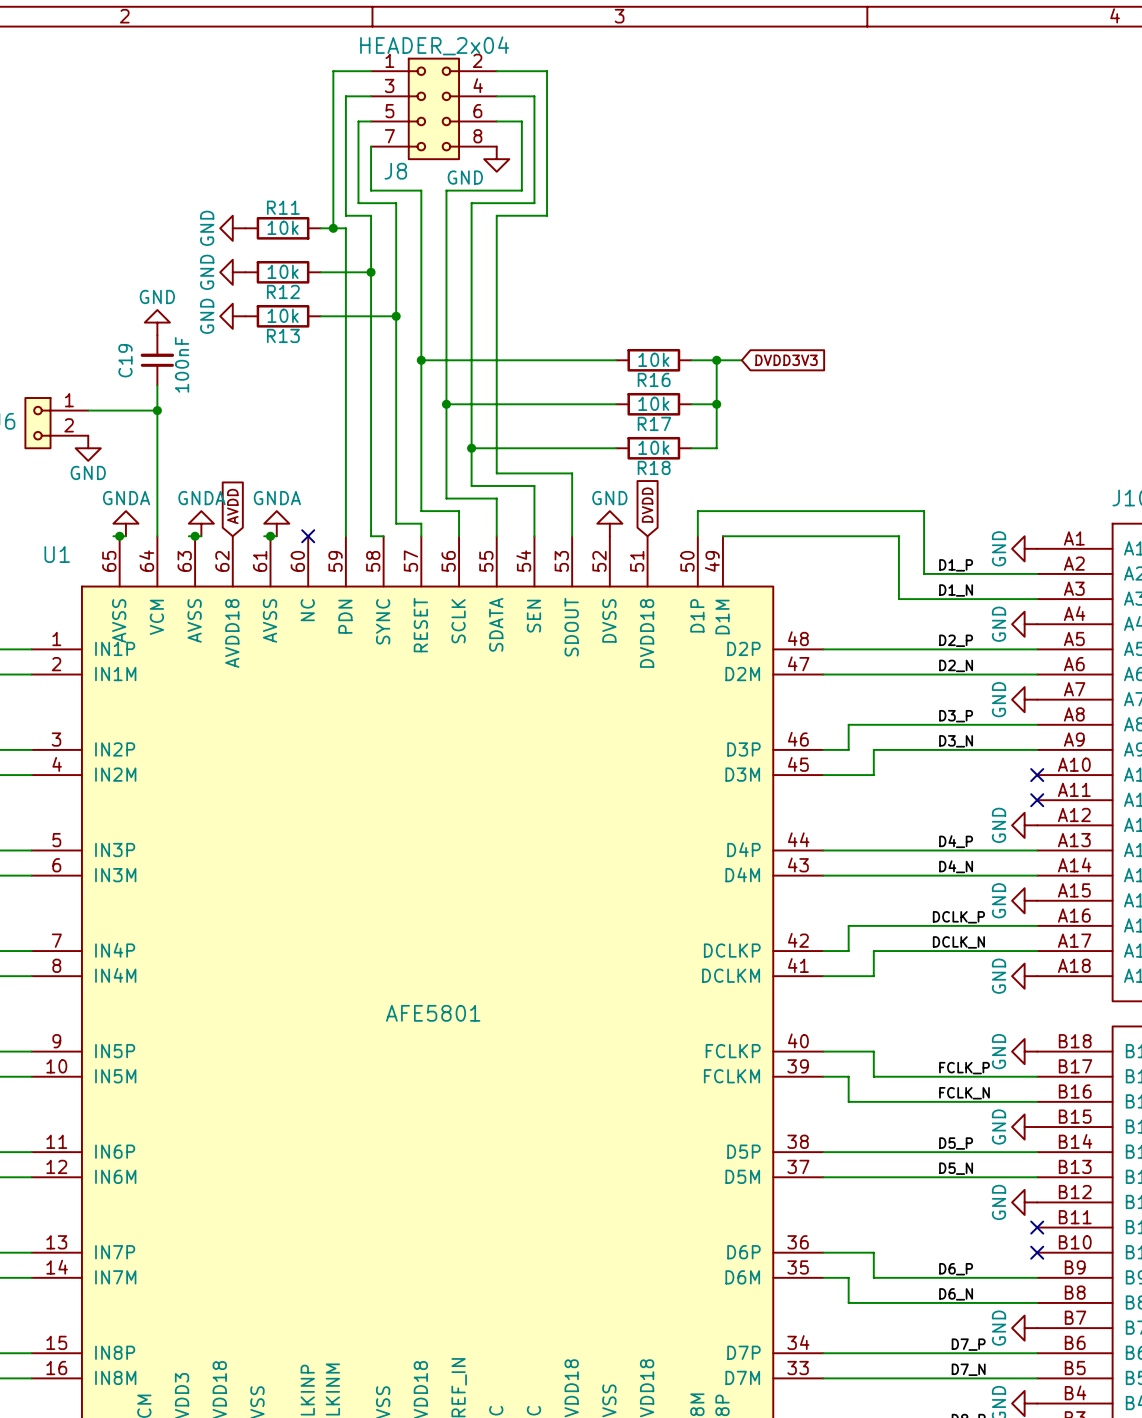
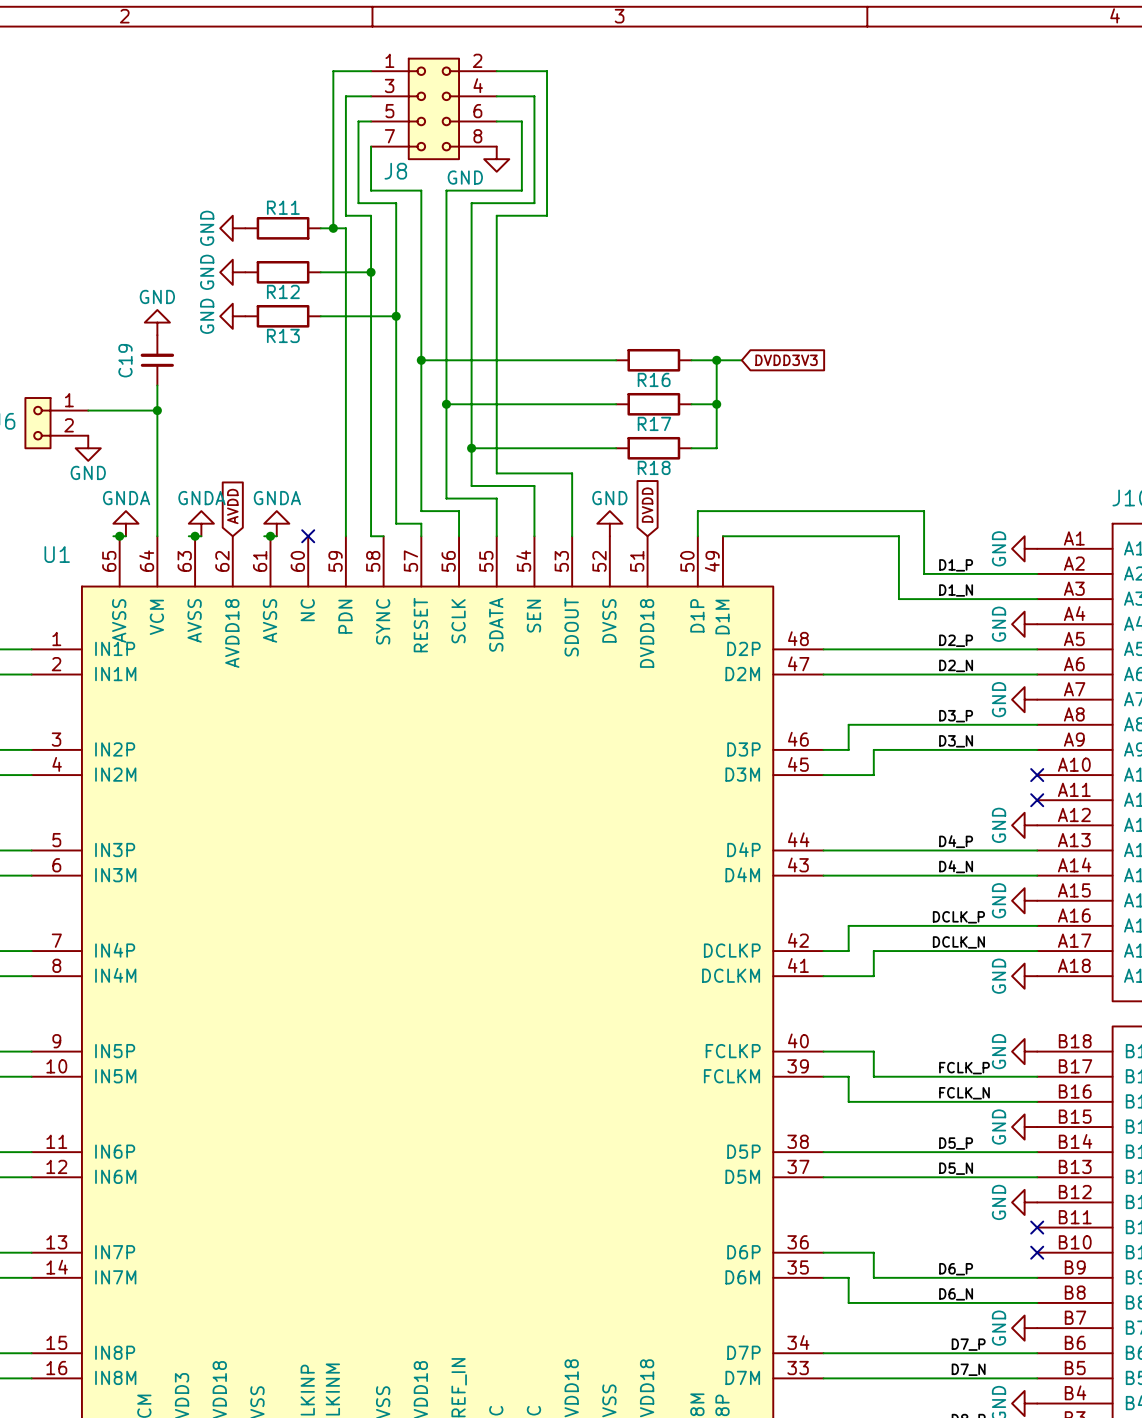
J8 value: HEADER_2x04 (434, 45) -> none
R11 value: 10k (283, 227) -> none
R12 value: 10k (283, 271) -> none
R13 value: 10k (283, 315) -> none
R16 value: 10k (653, 359) -> none
C19 value: 100nF (182, 364) -> none
R17 value: 10k (653, 403) -> none
R18 value: 10k (653, 447) -> none
U1 value: AFE5801 (433, 1013) -> none

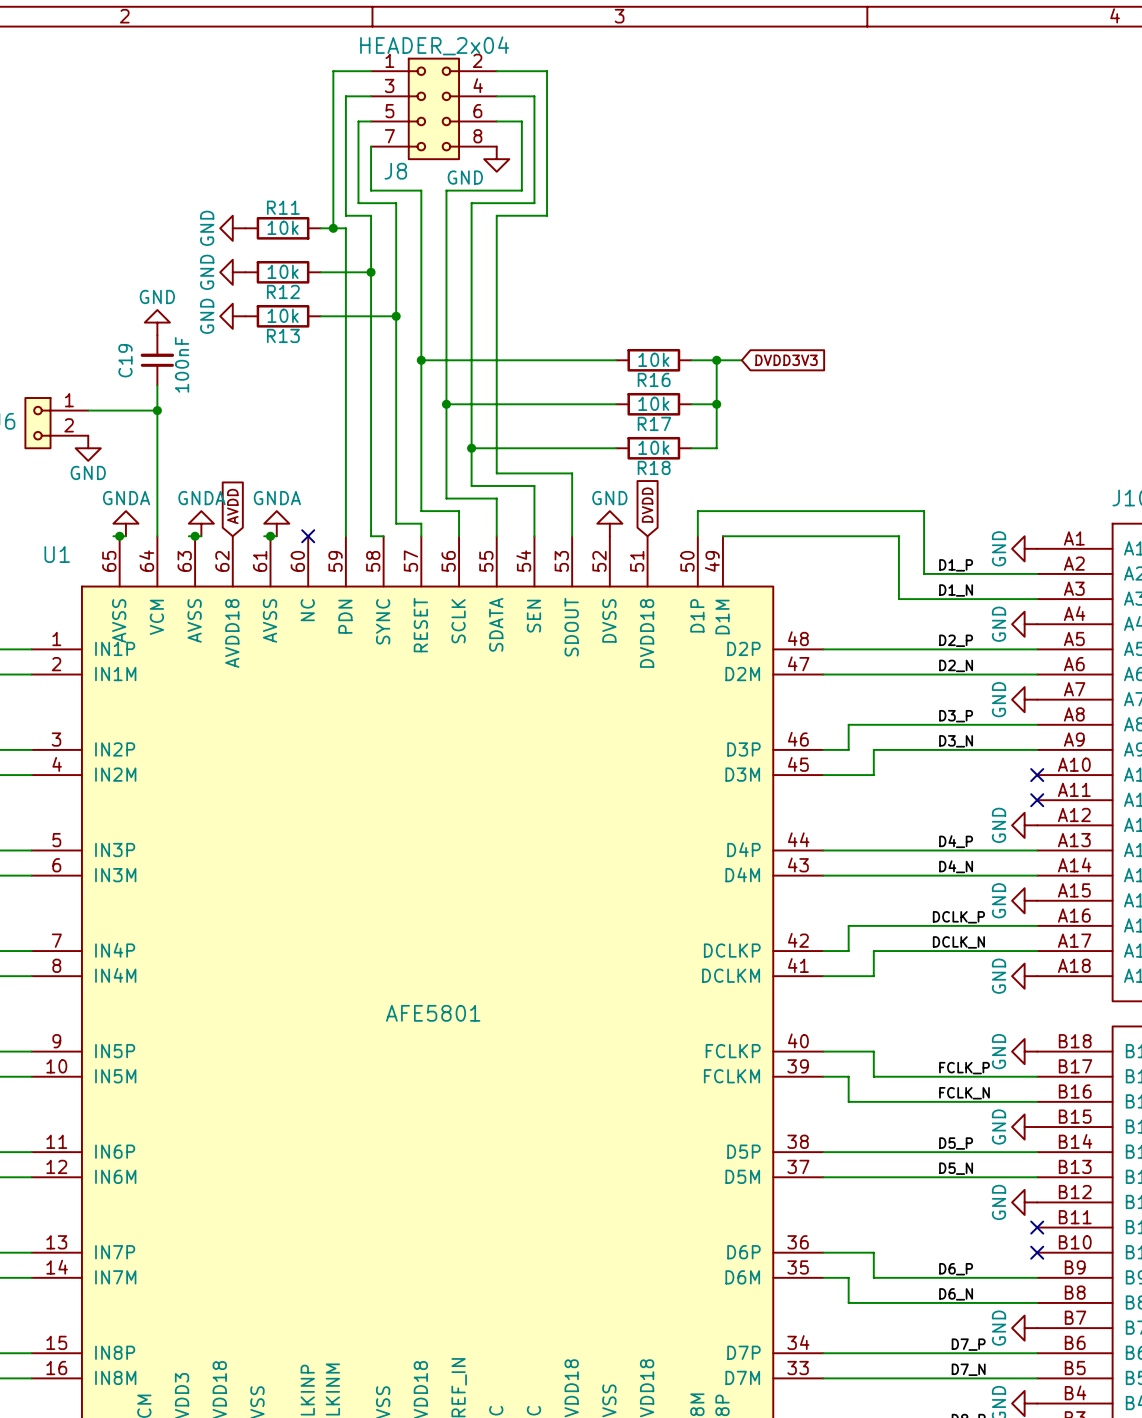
J8 value: none -> HEADER_2x04 (434, 45)
R11 value: none -> 10k (283, 227)
R12 value: none -> 10k (283, 271)
R13 value: none -> 10k (283, 315)
R16 value: none -> 10k (653, 359)
C19 value: none -> 100nF (182, 364)
R17 value: none -> 10k (653, 403)
R18 value: none -> 10k (653, 447)
U1 value: none -> AFE5801 (433, 1013)

